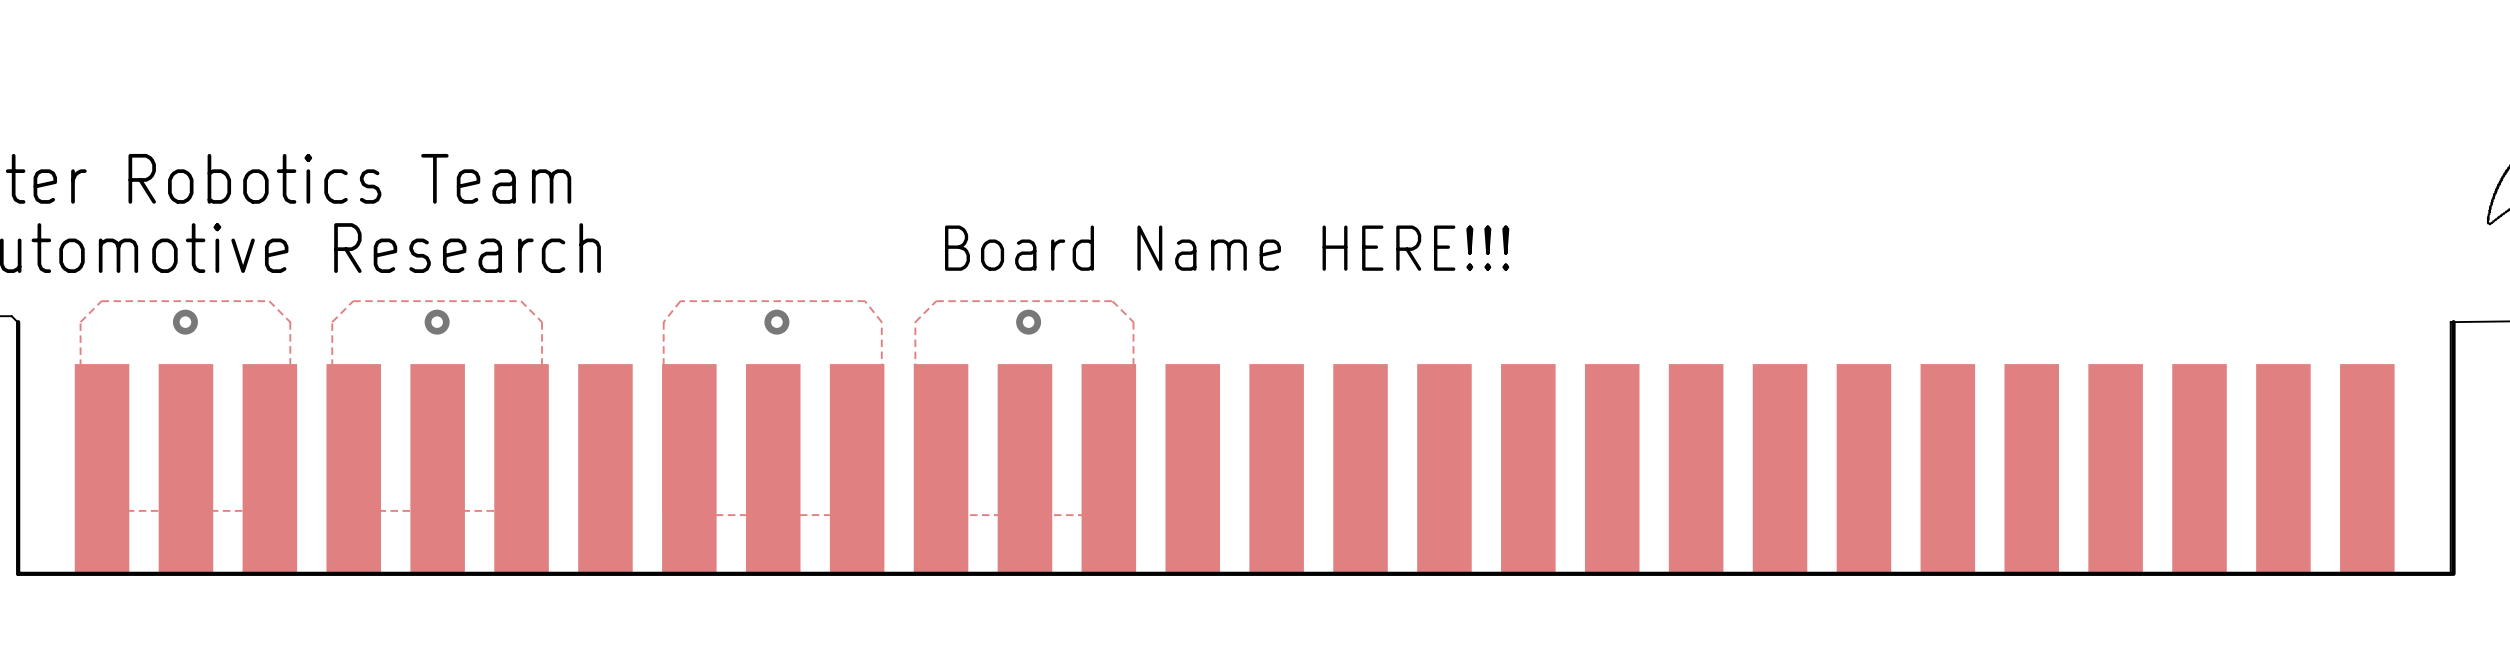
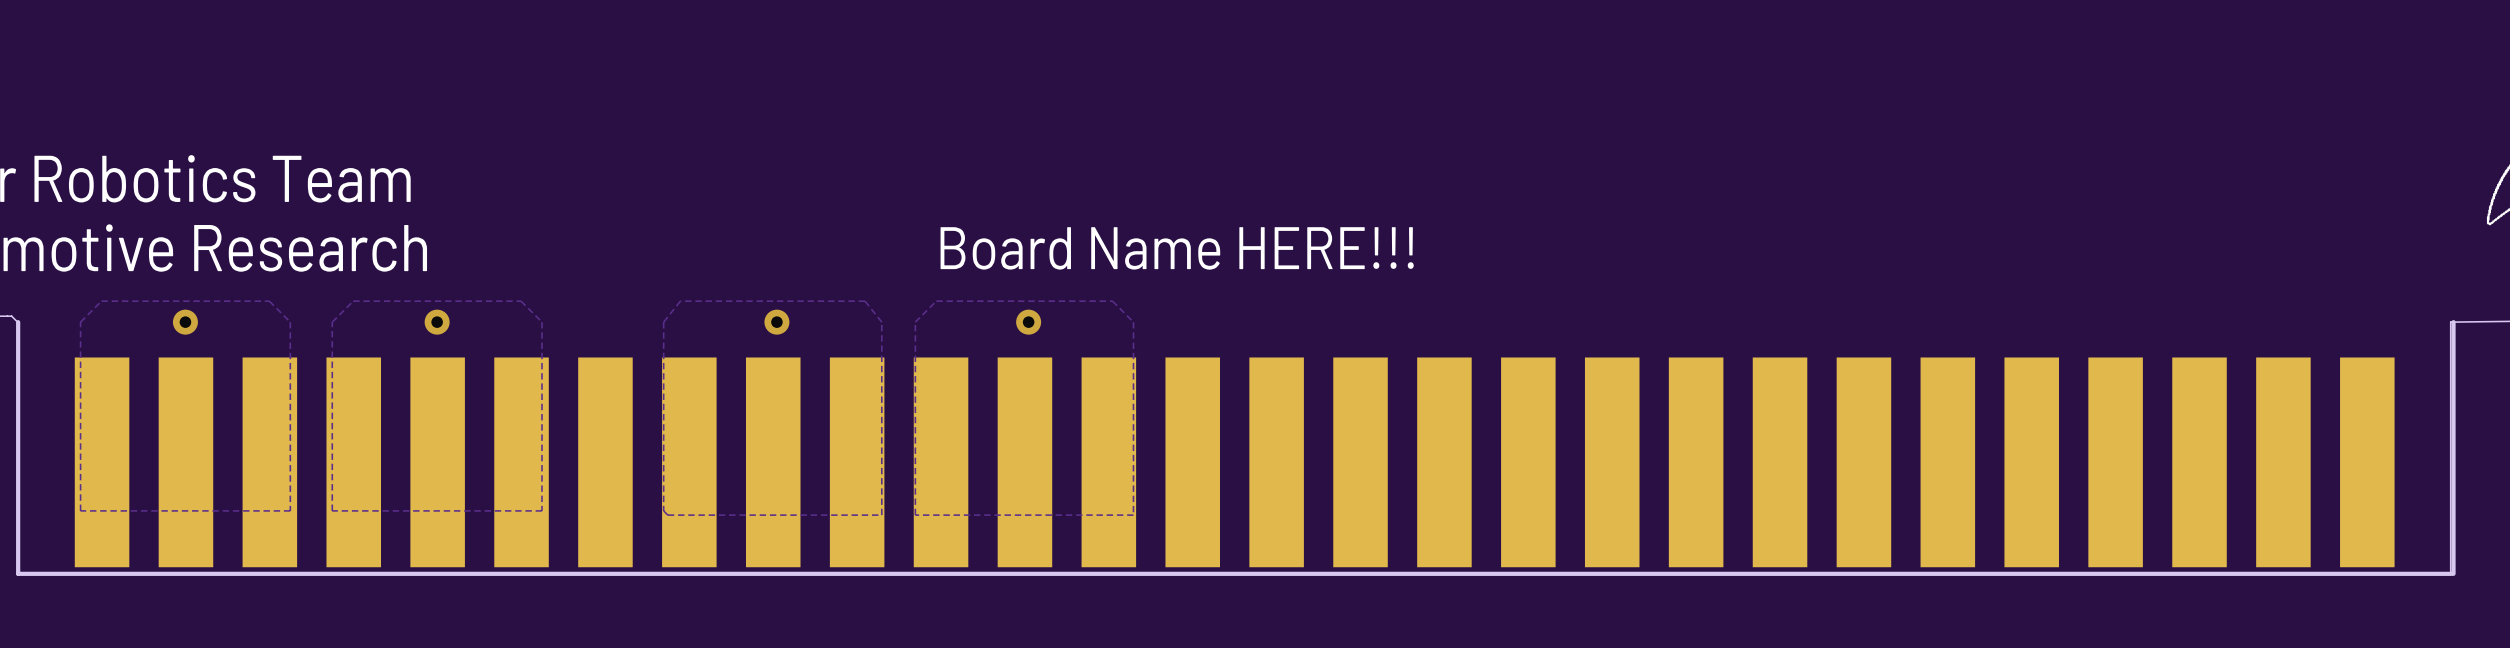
part footprint: [16, 320, 2456, 576] -> [16, 320, 2456, 576]

